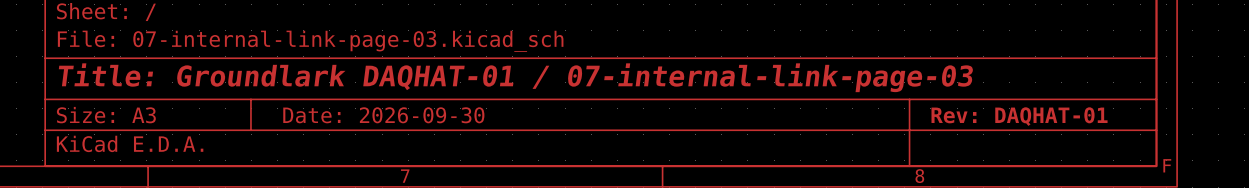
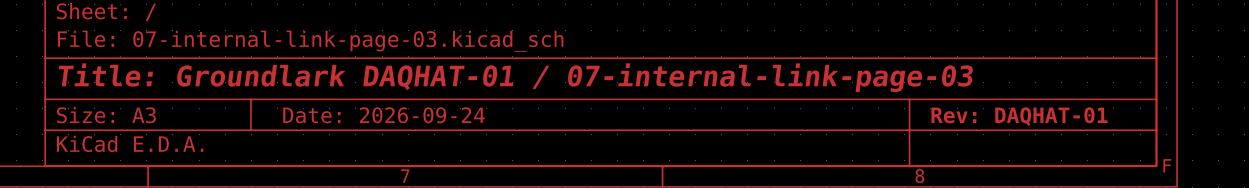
title block: Date: 2026-09-30 (383, 115) -> Date: 2026-09-24 (384, 115)

